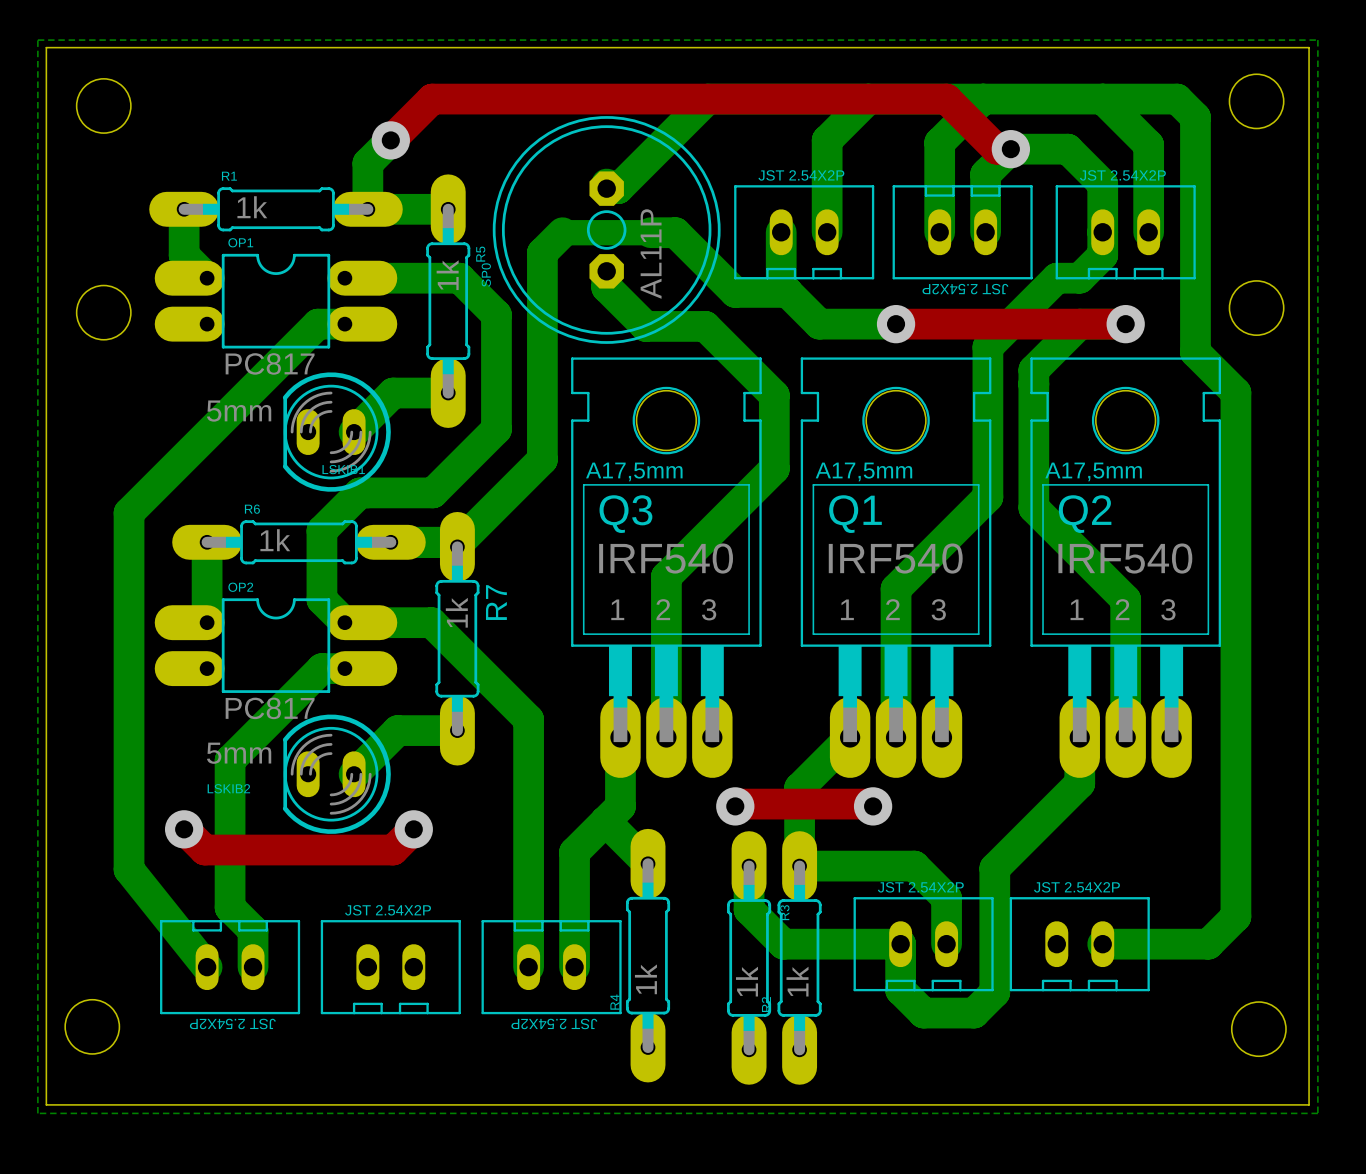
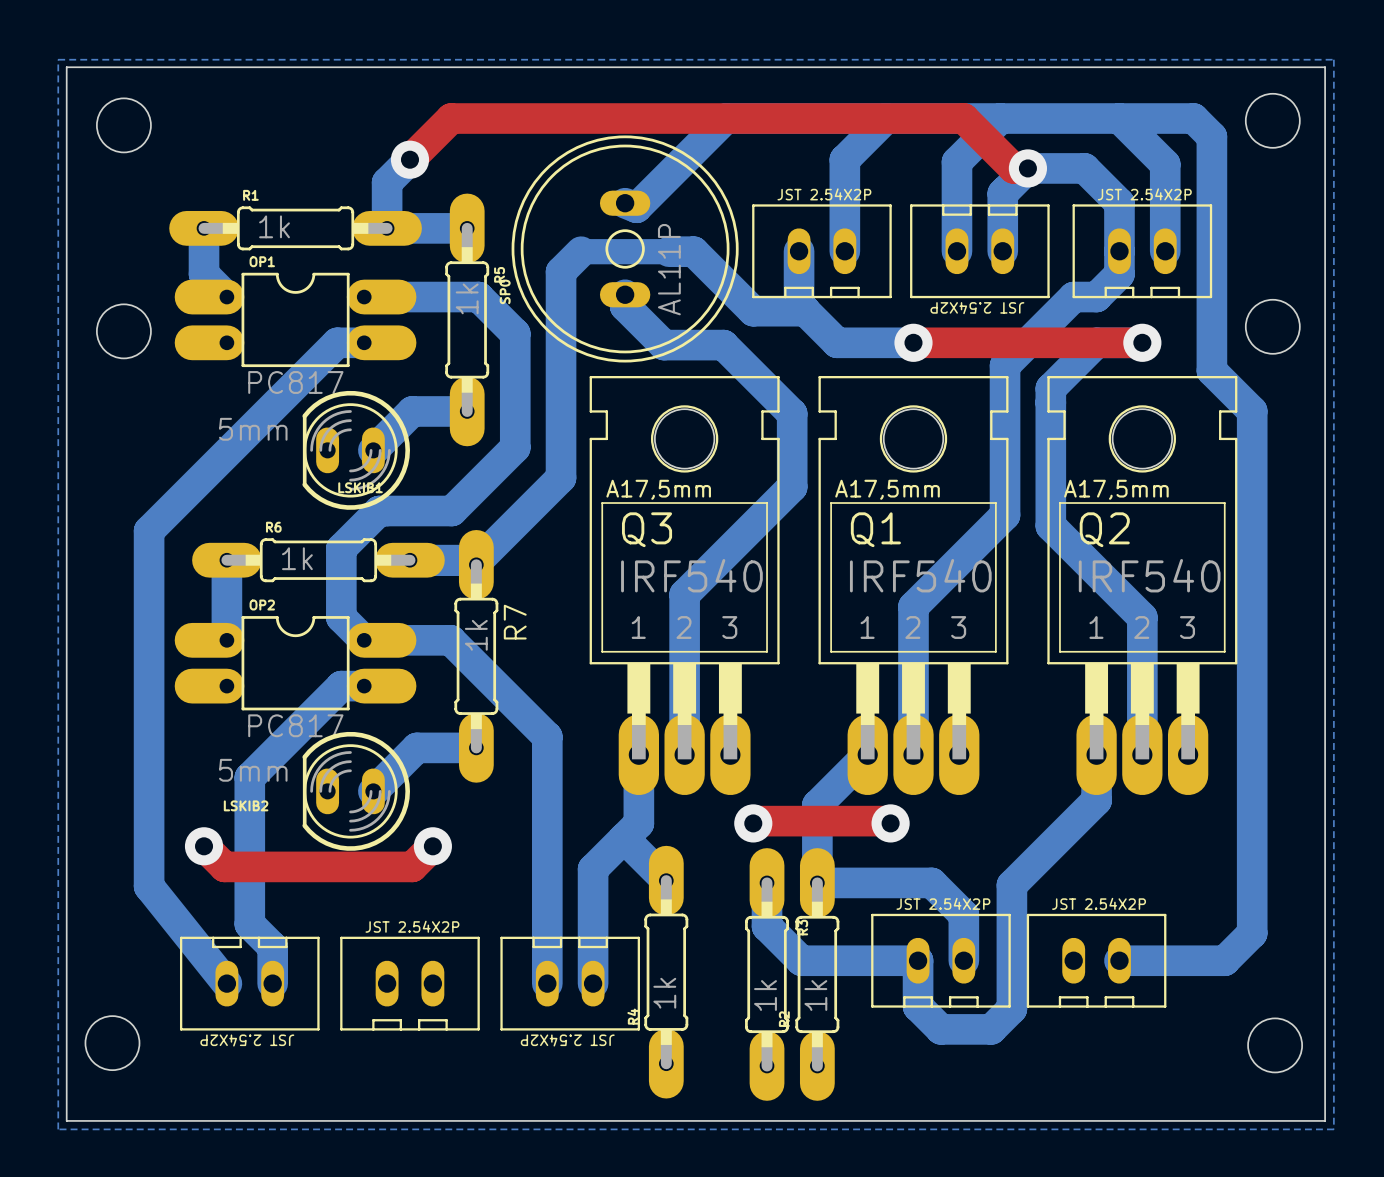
SP0 footprint: [492, 116, 721, 344] -> [511, 135, 739, 363]

